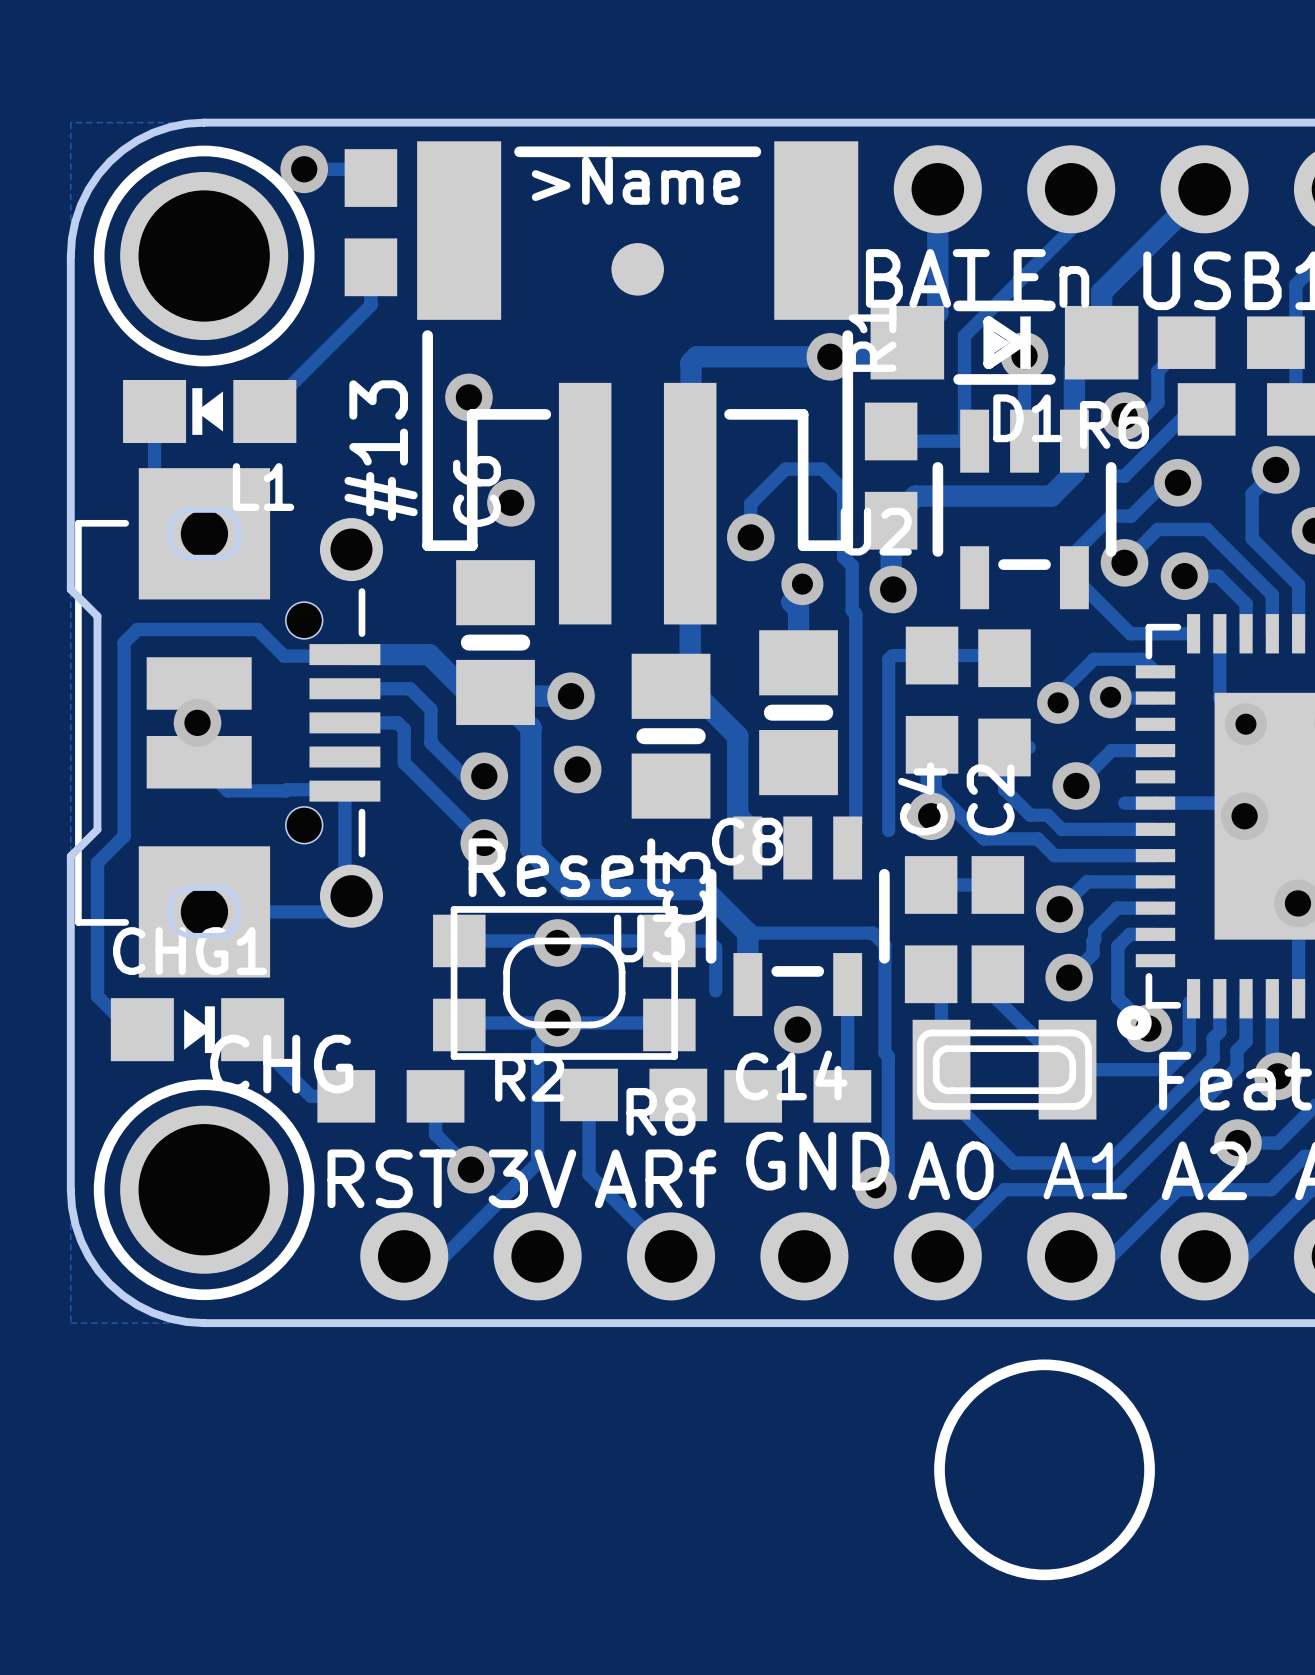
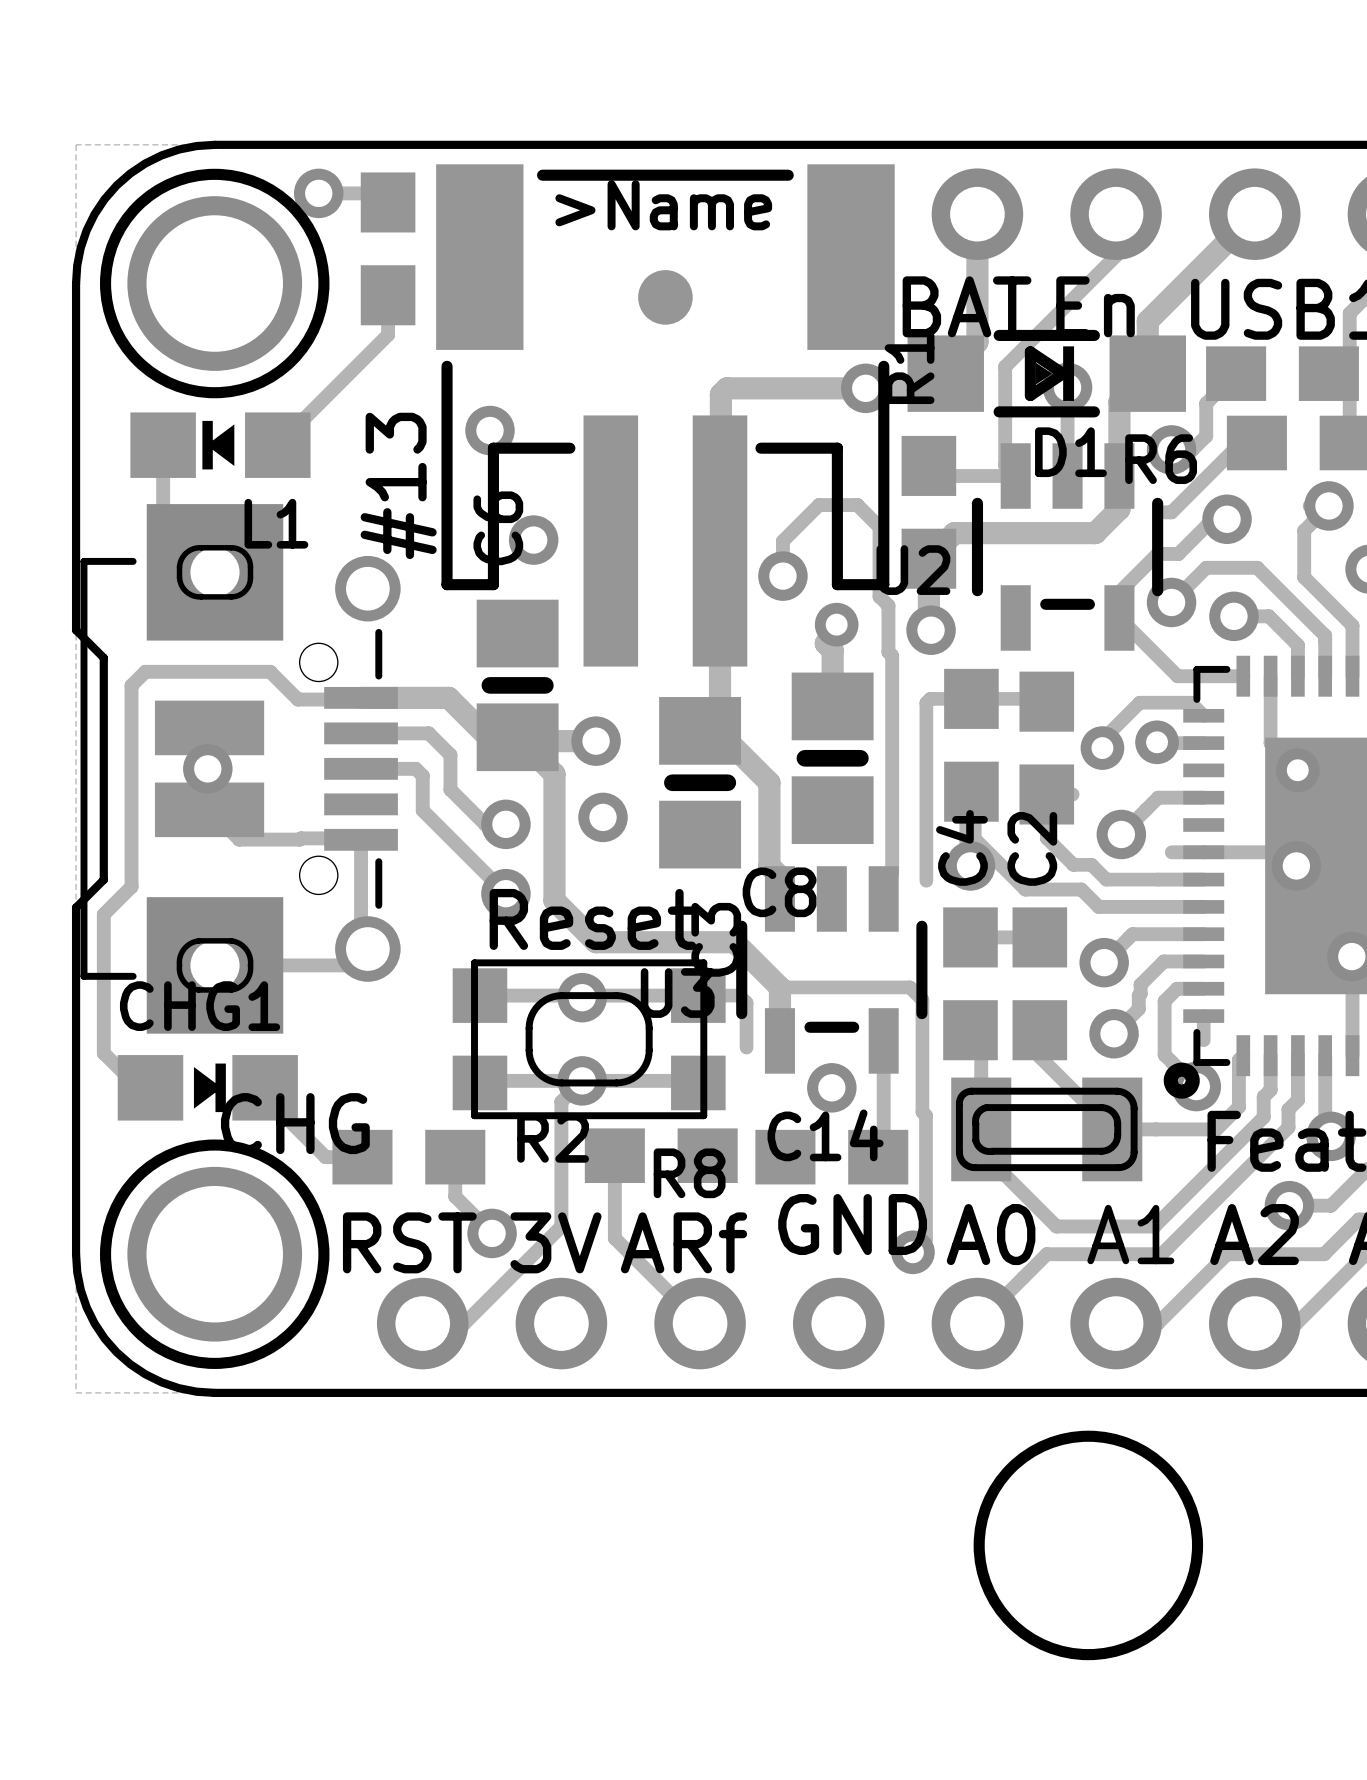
track: none -> (1203, 1016) (1203, 1040)

